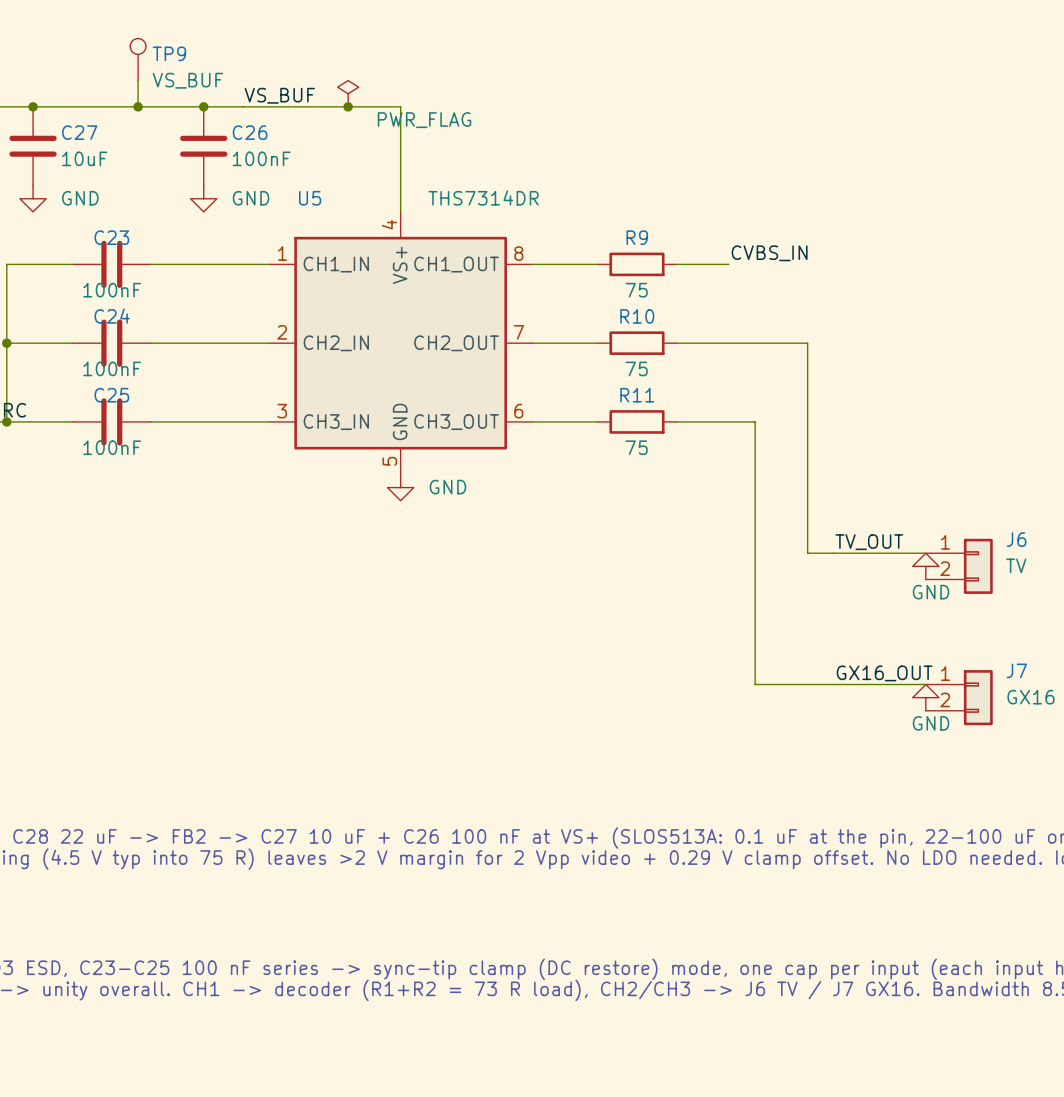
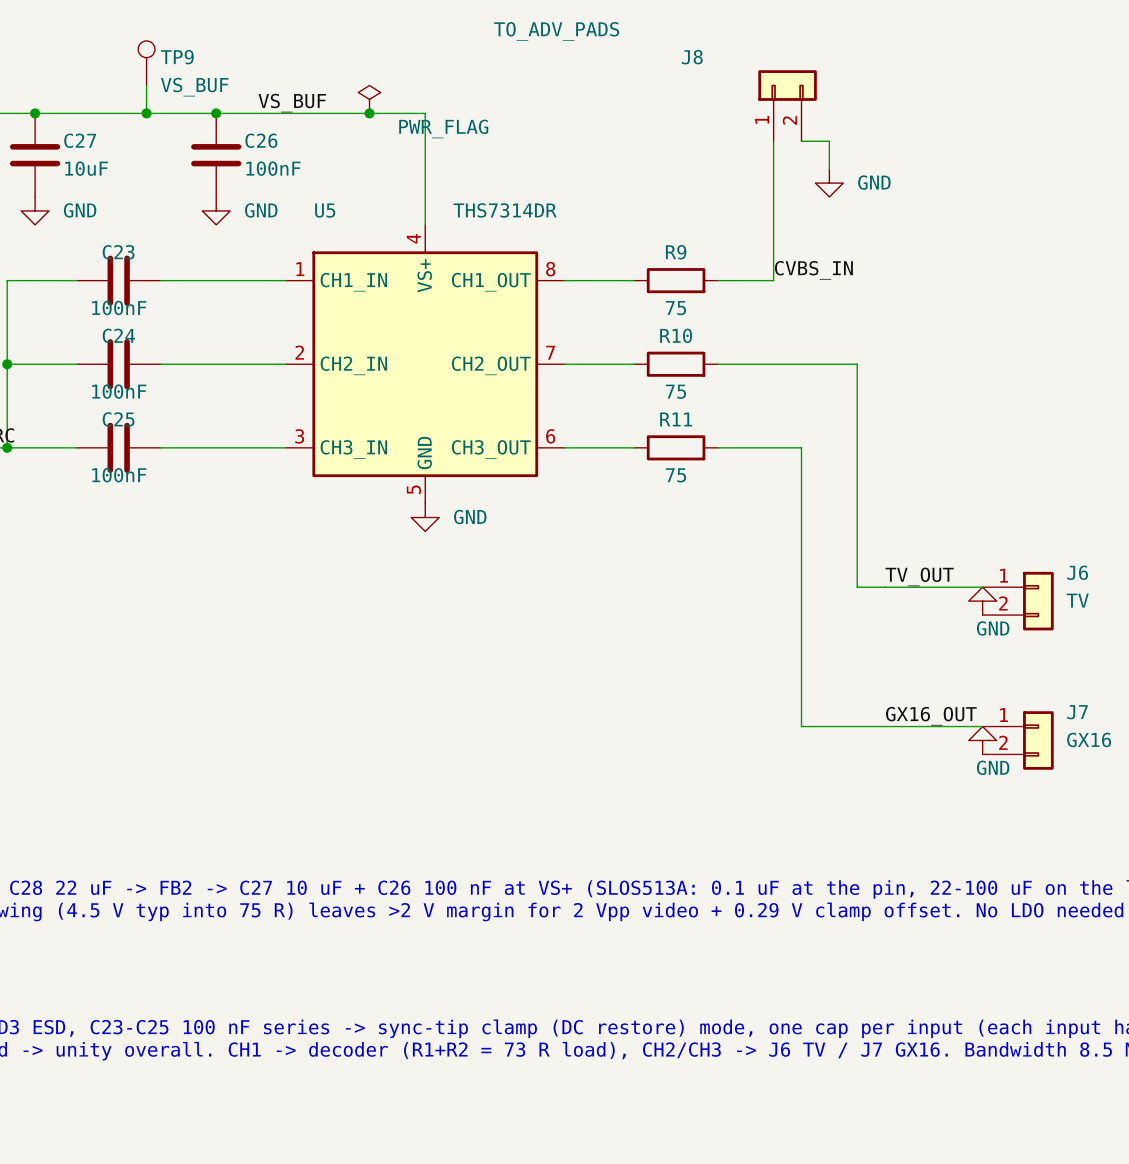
J8: none -> TO_ADV_PADS (787, 105)
wire: none -> (773, 141) (773, 280)
wire: none -> (801, 141) (829, 141) (829, 169)
power symbol: none -> GND (829, 183)

